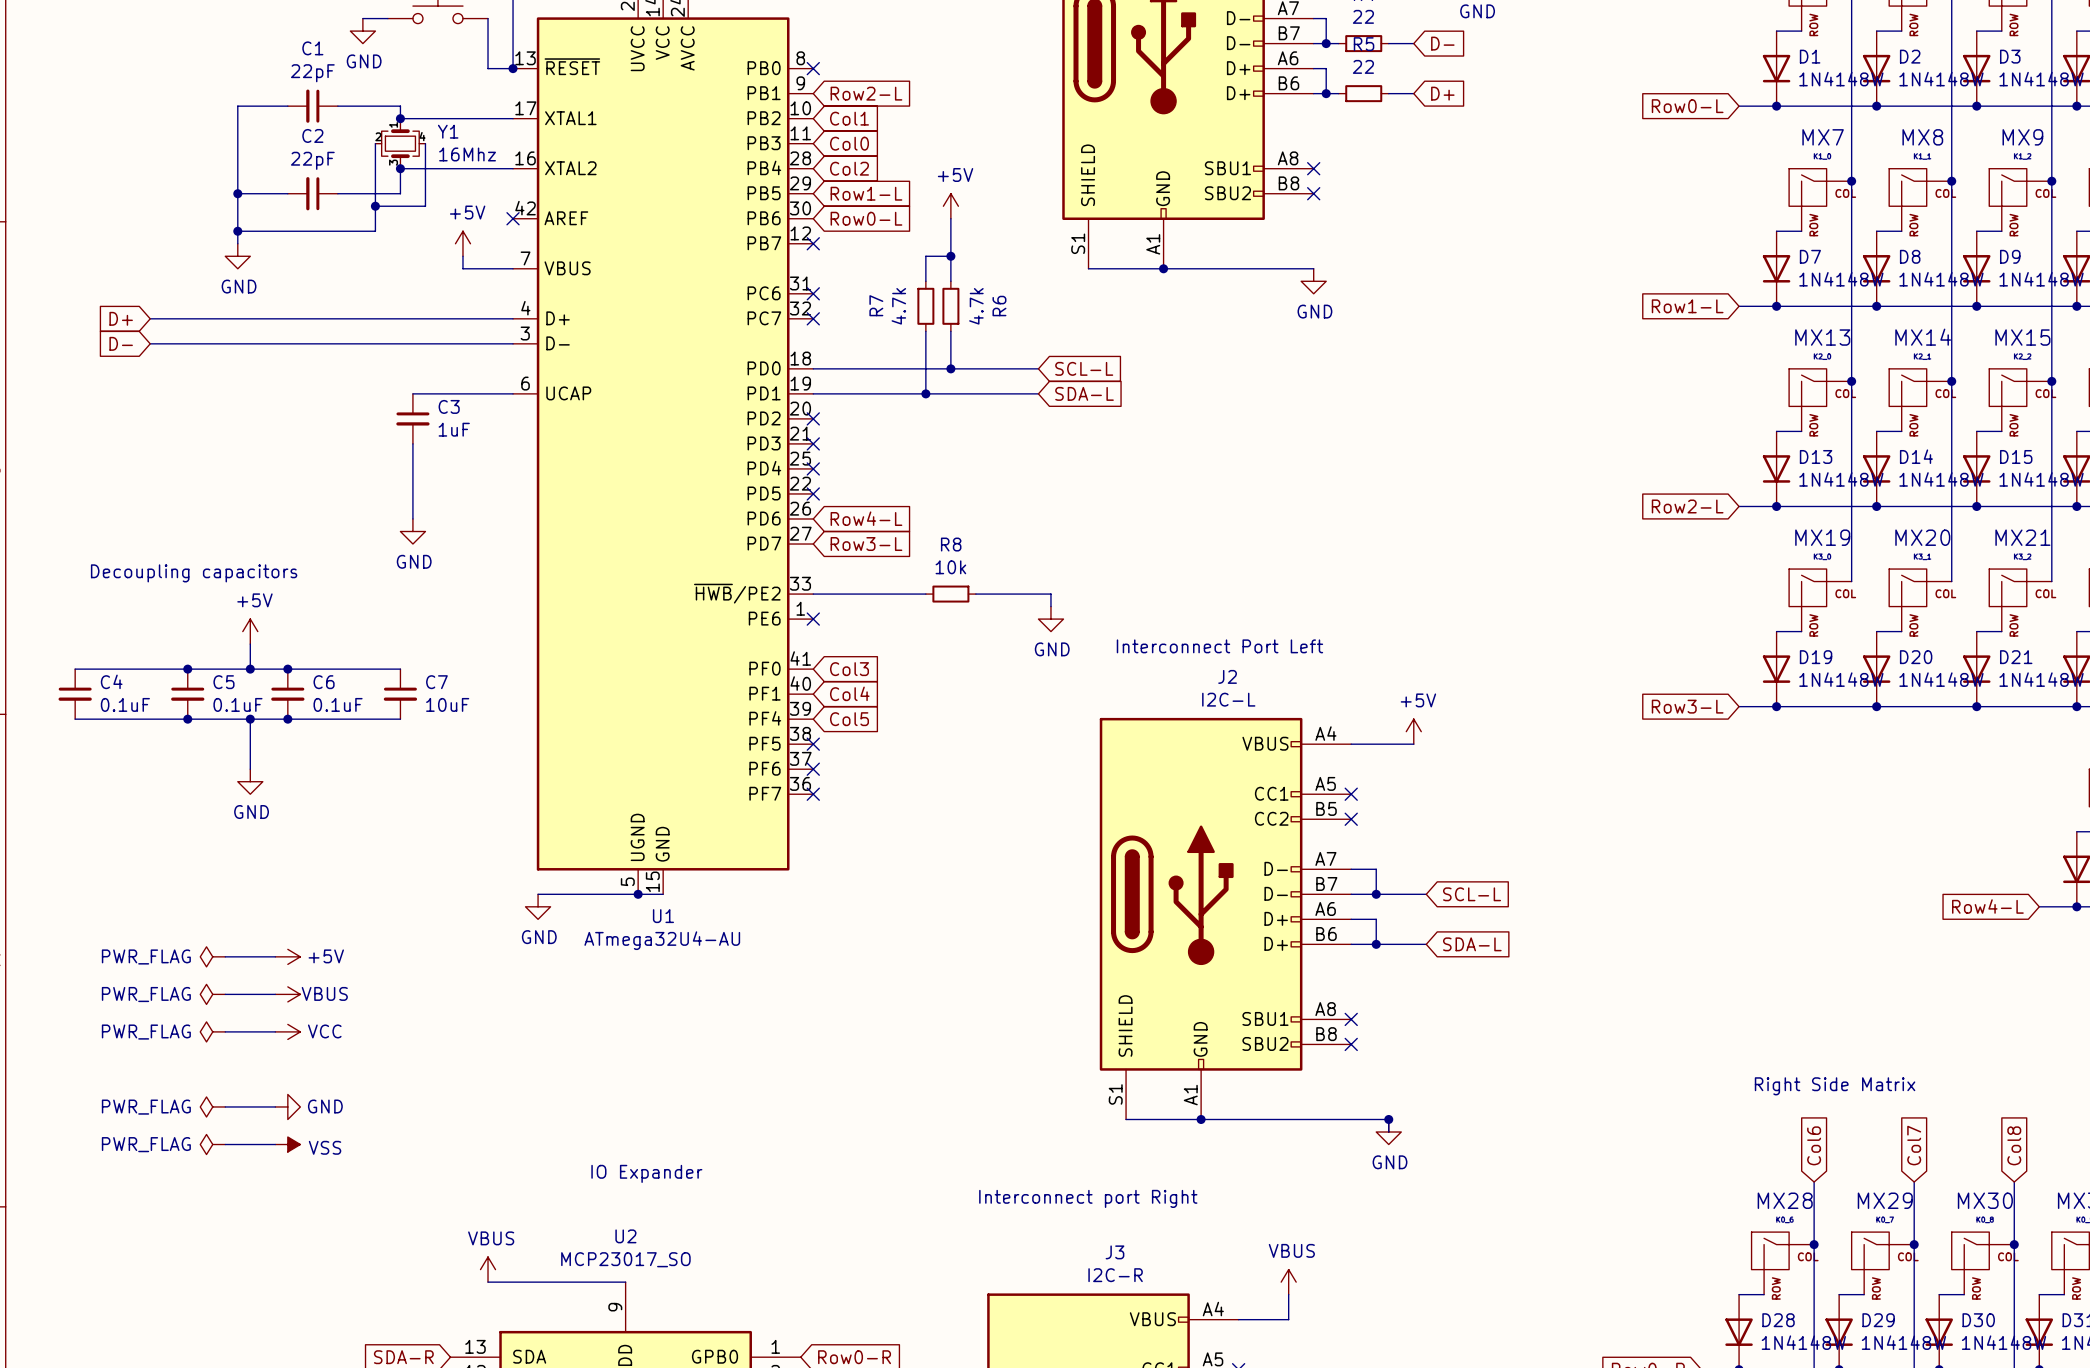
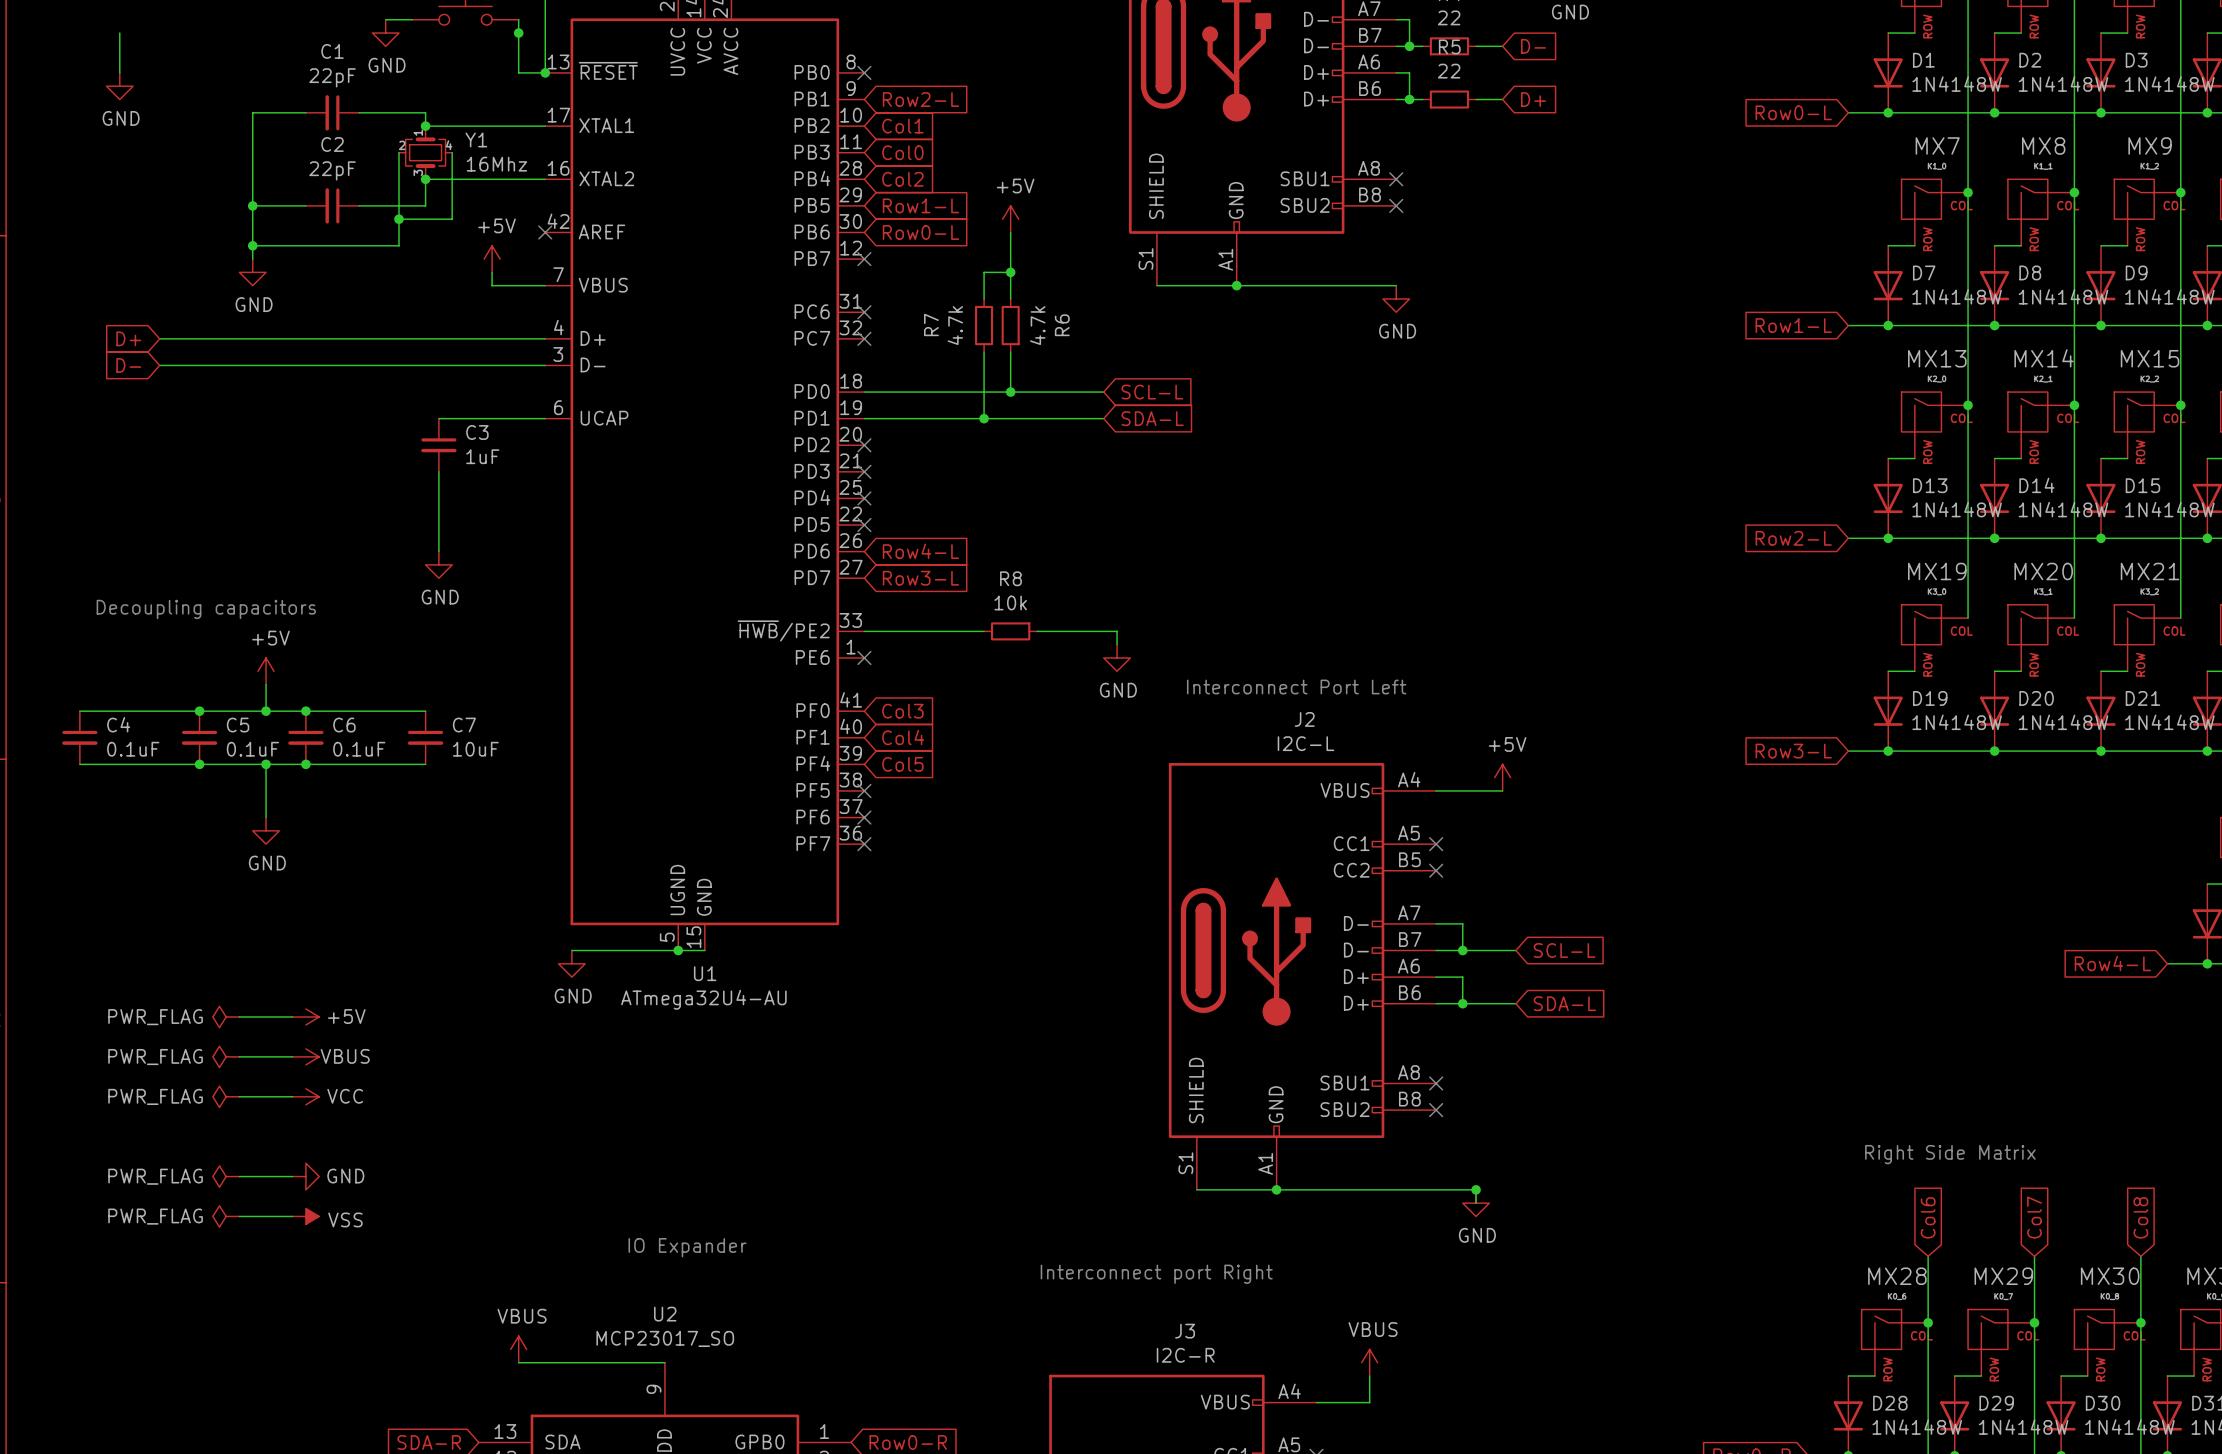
wire: none -> (119, 33) (119, 72)
junction: none -> (518, 33)
power symbol: none -> GND (119, 86)

